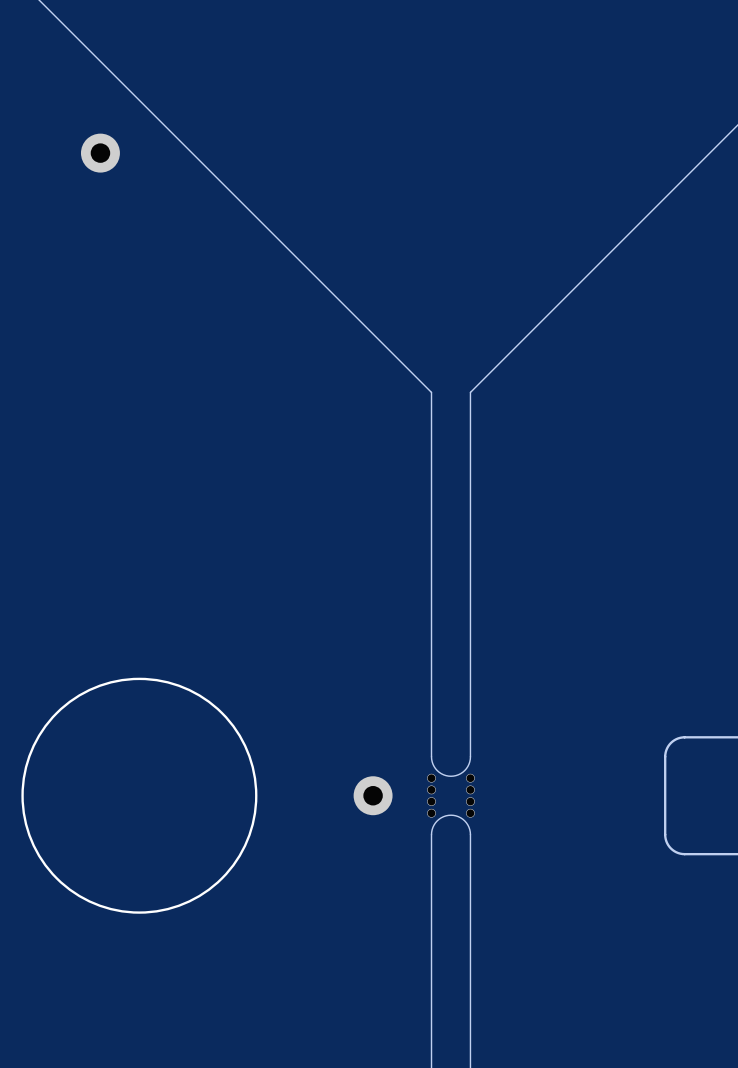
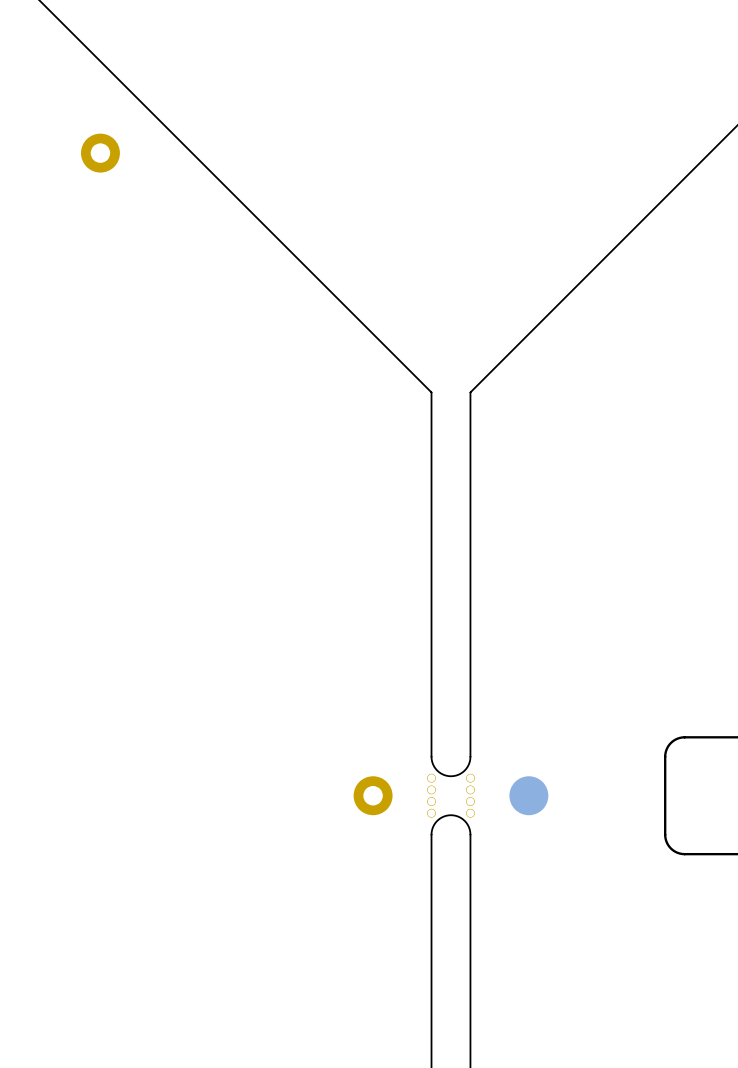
drawing: [21, 677, 258, 914] -> none
part: none -> (528, 795)

